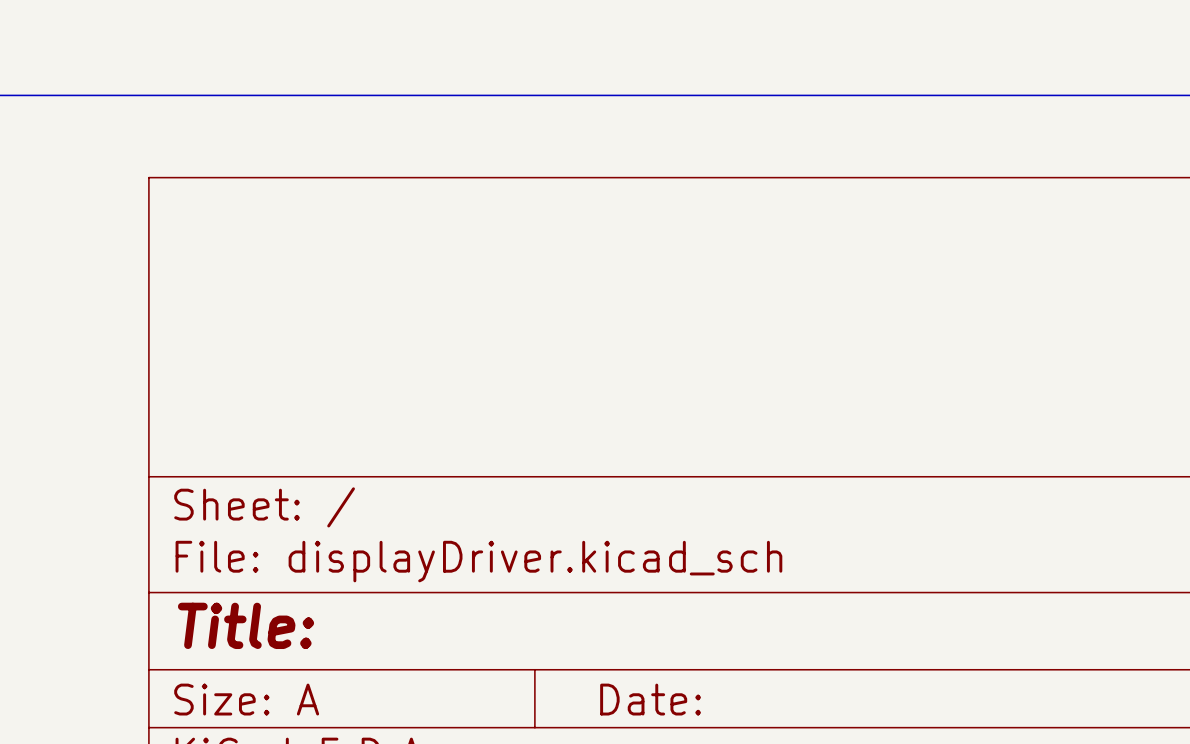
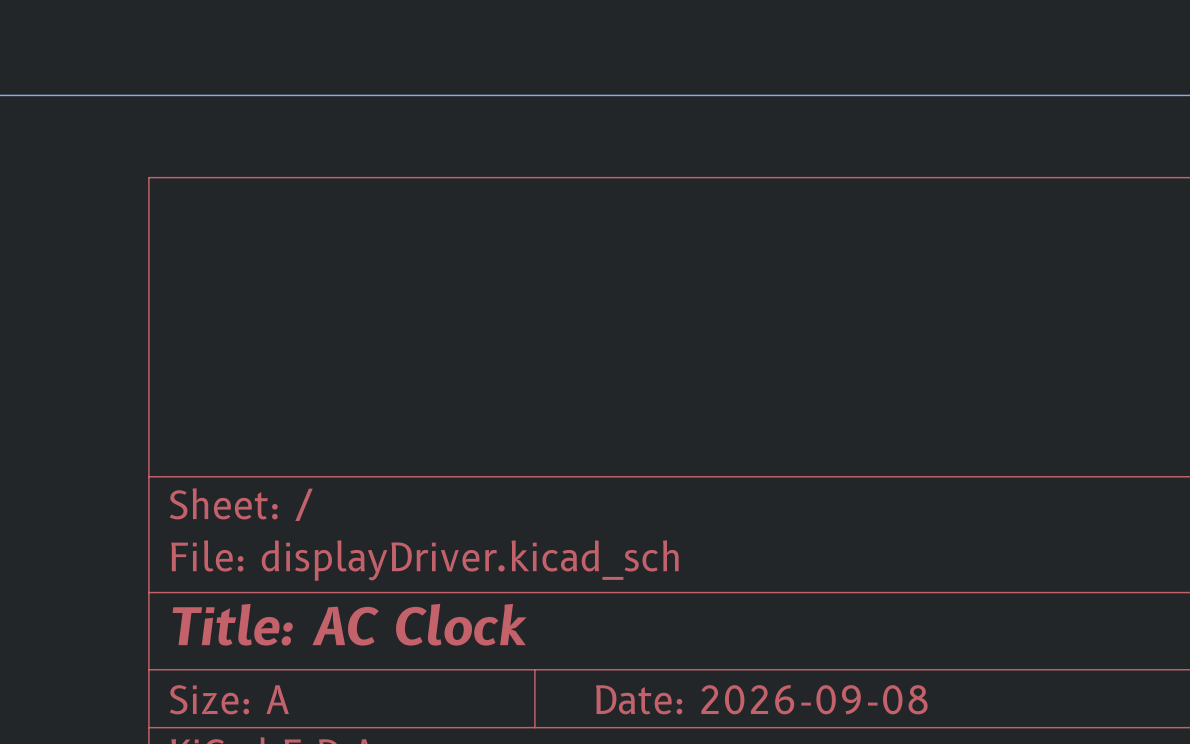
title block: Title: (246, 625) -> Title: AC Clock (349, 624)
title block: Date: (650, 699) -> Date: 2026-09-08 (761, 699)

